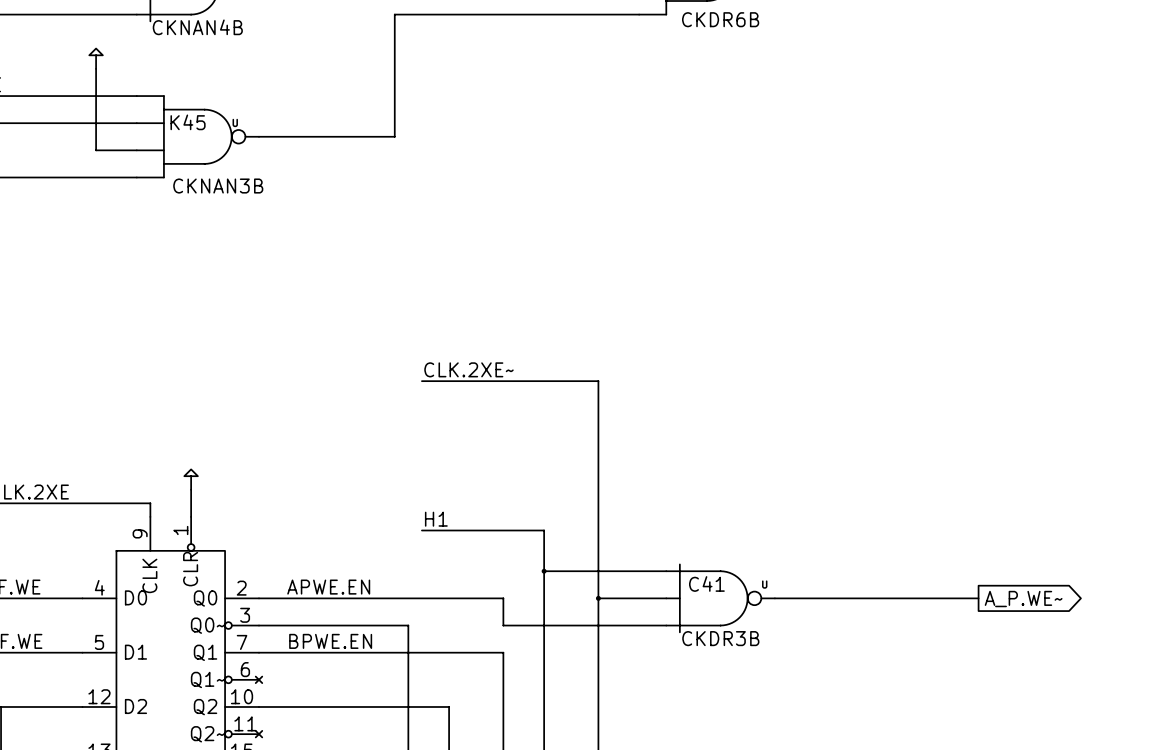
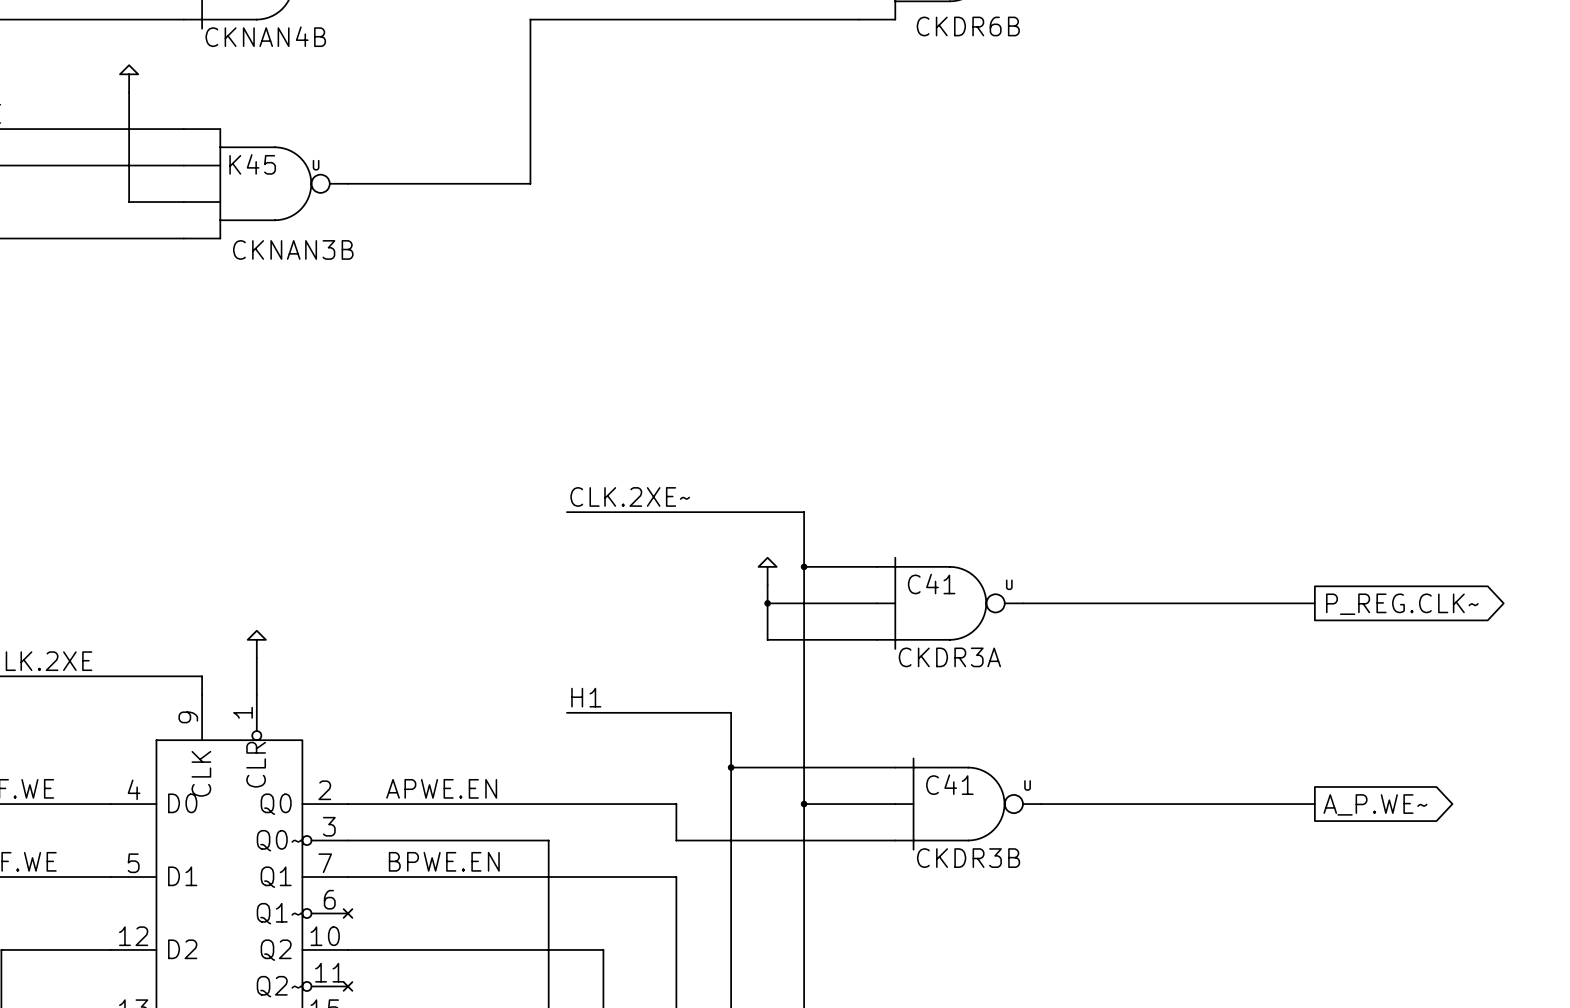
wire: none -> (804, 566) (877, 566)
junction: none -> (804, 566)
power symbol: none -> (767, 571)
wire: none -> (767, 585) (767, 639) (877, 639)
wire: none -> (767, 603) (877, 603)
junction: none -> (767, 603)
U: none -> (950, 603)
wire: none -> (1023, 603) (1314, 603)
global label: none -> P_REG.CLK~ (1402, 604)

